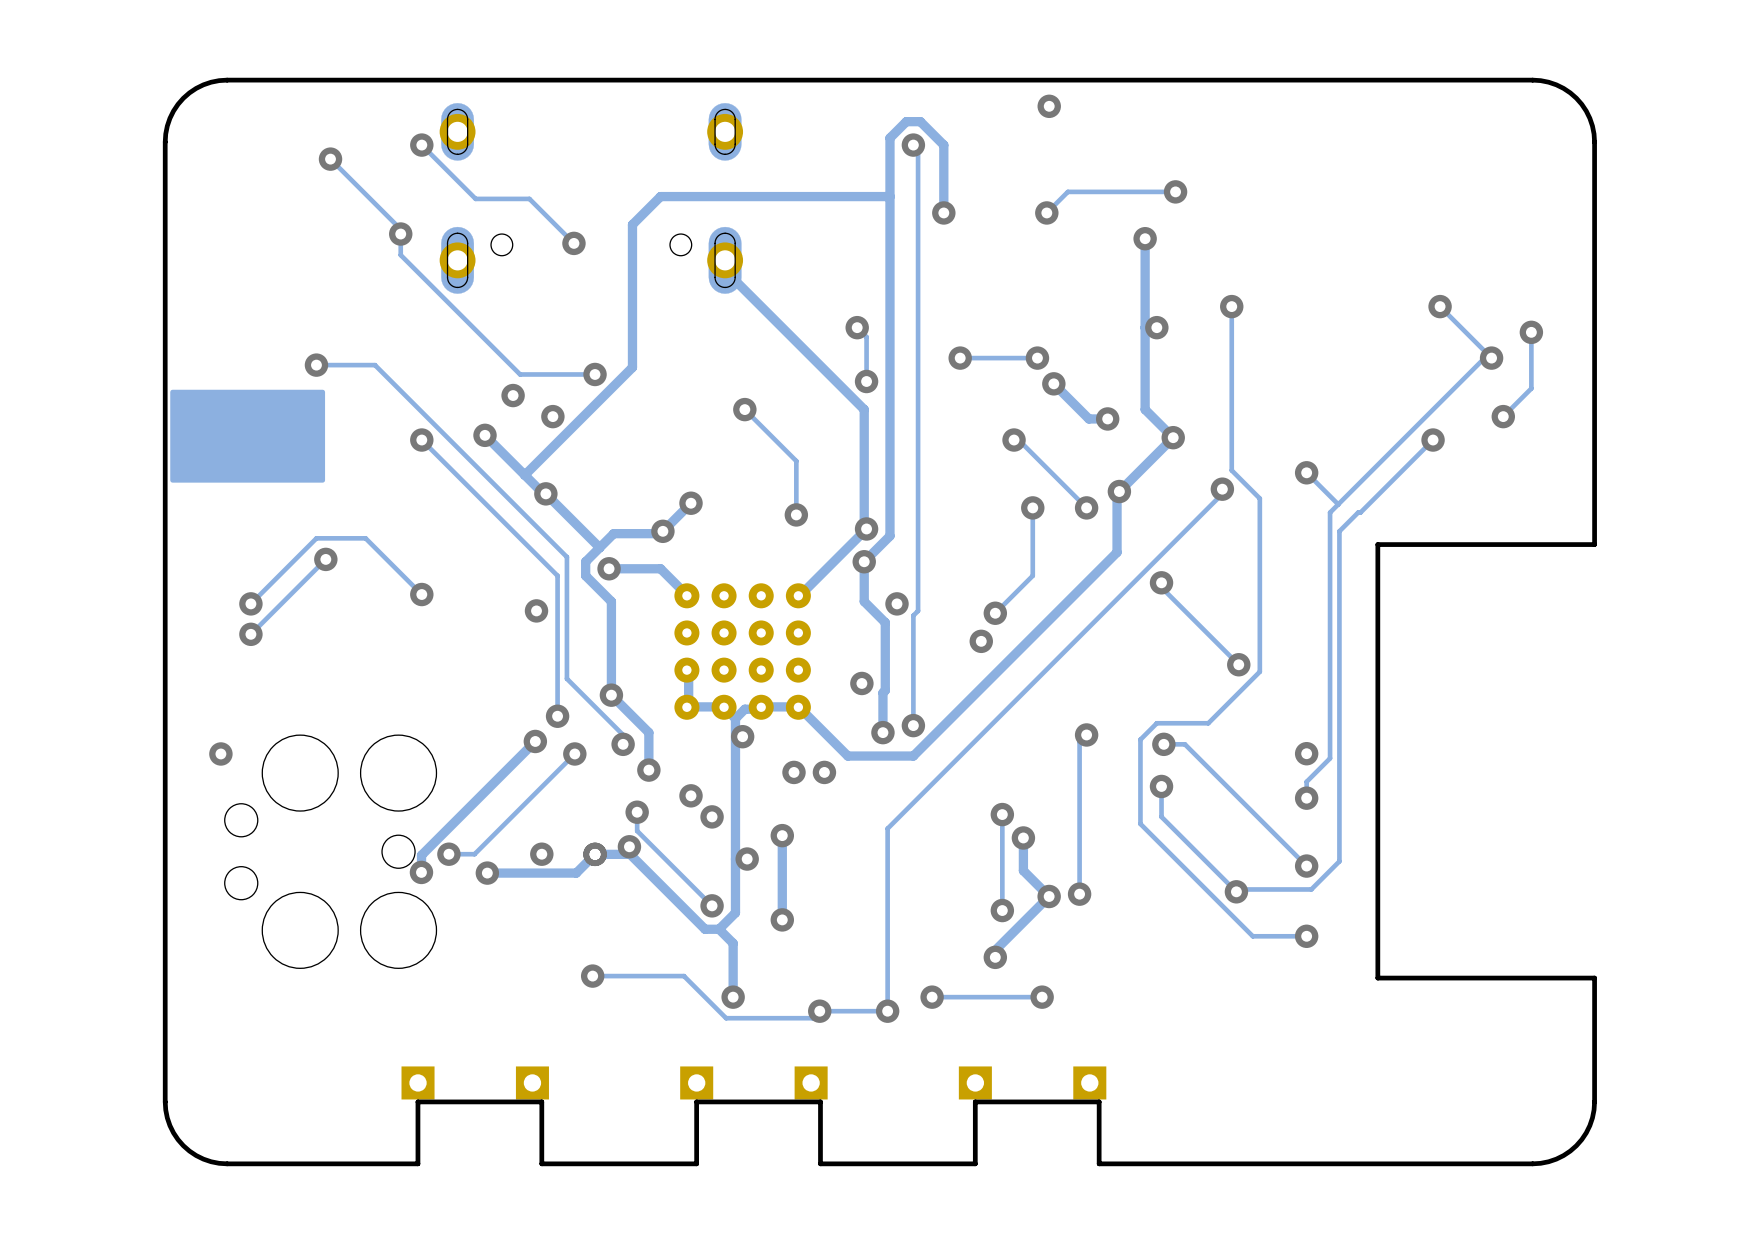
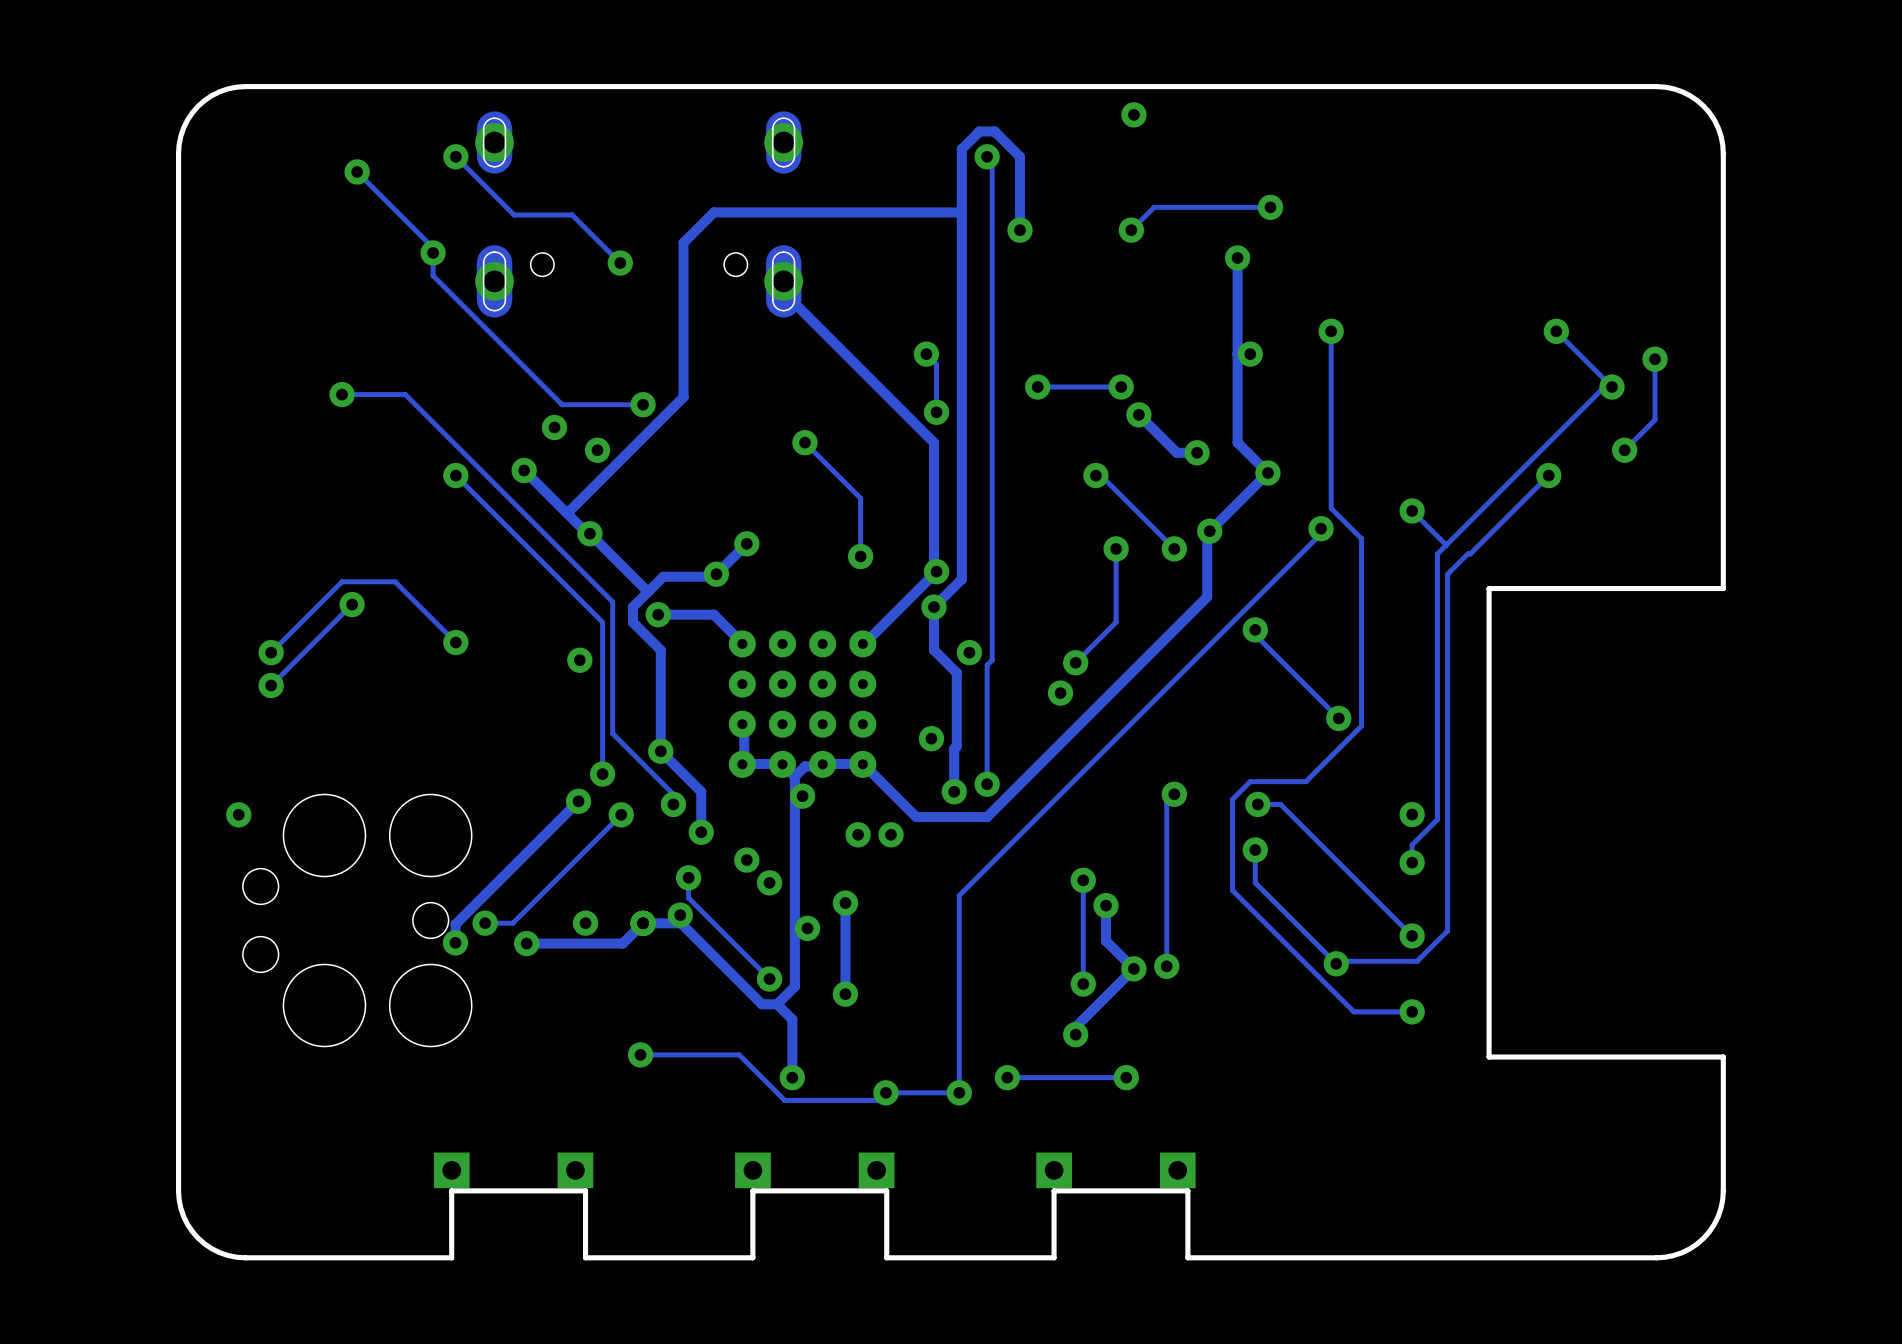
drawing: [170, 389, 326, 483] -> none

